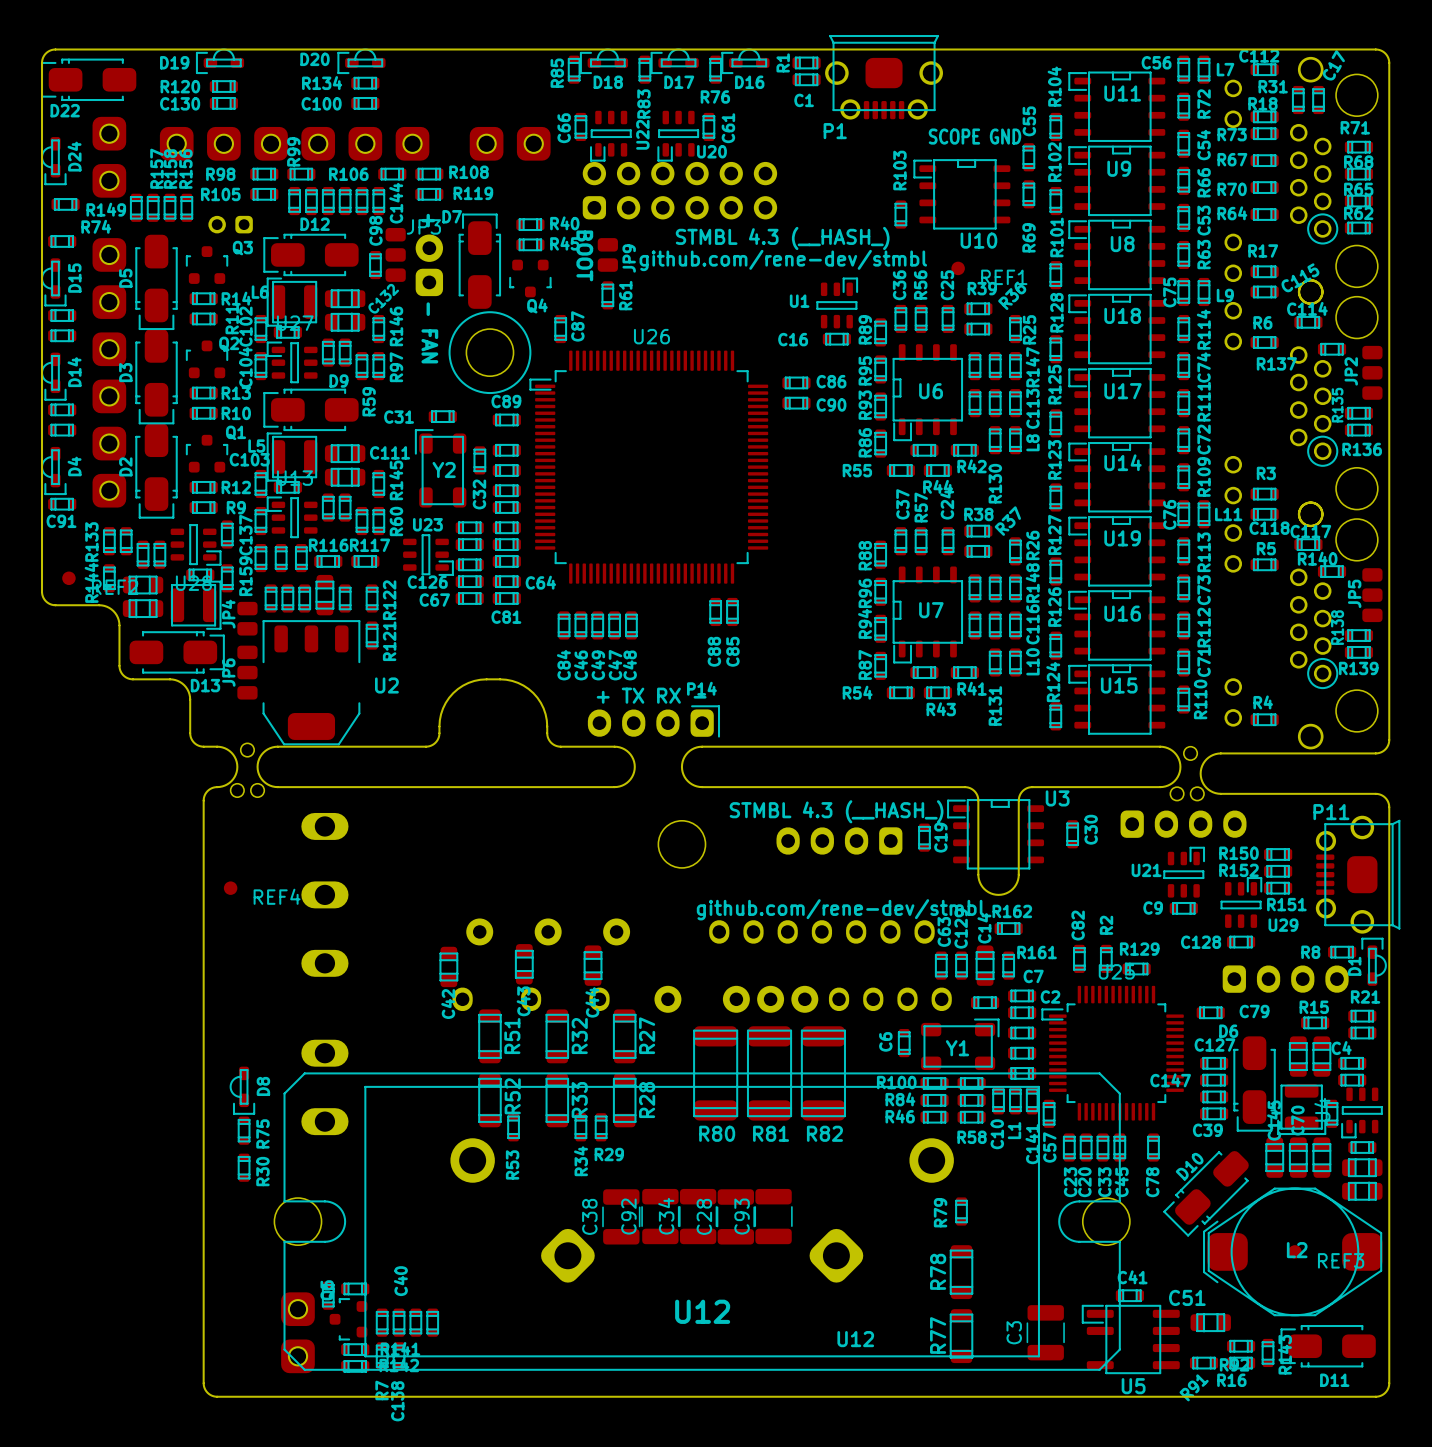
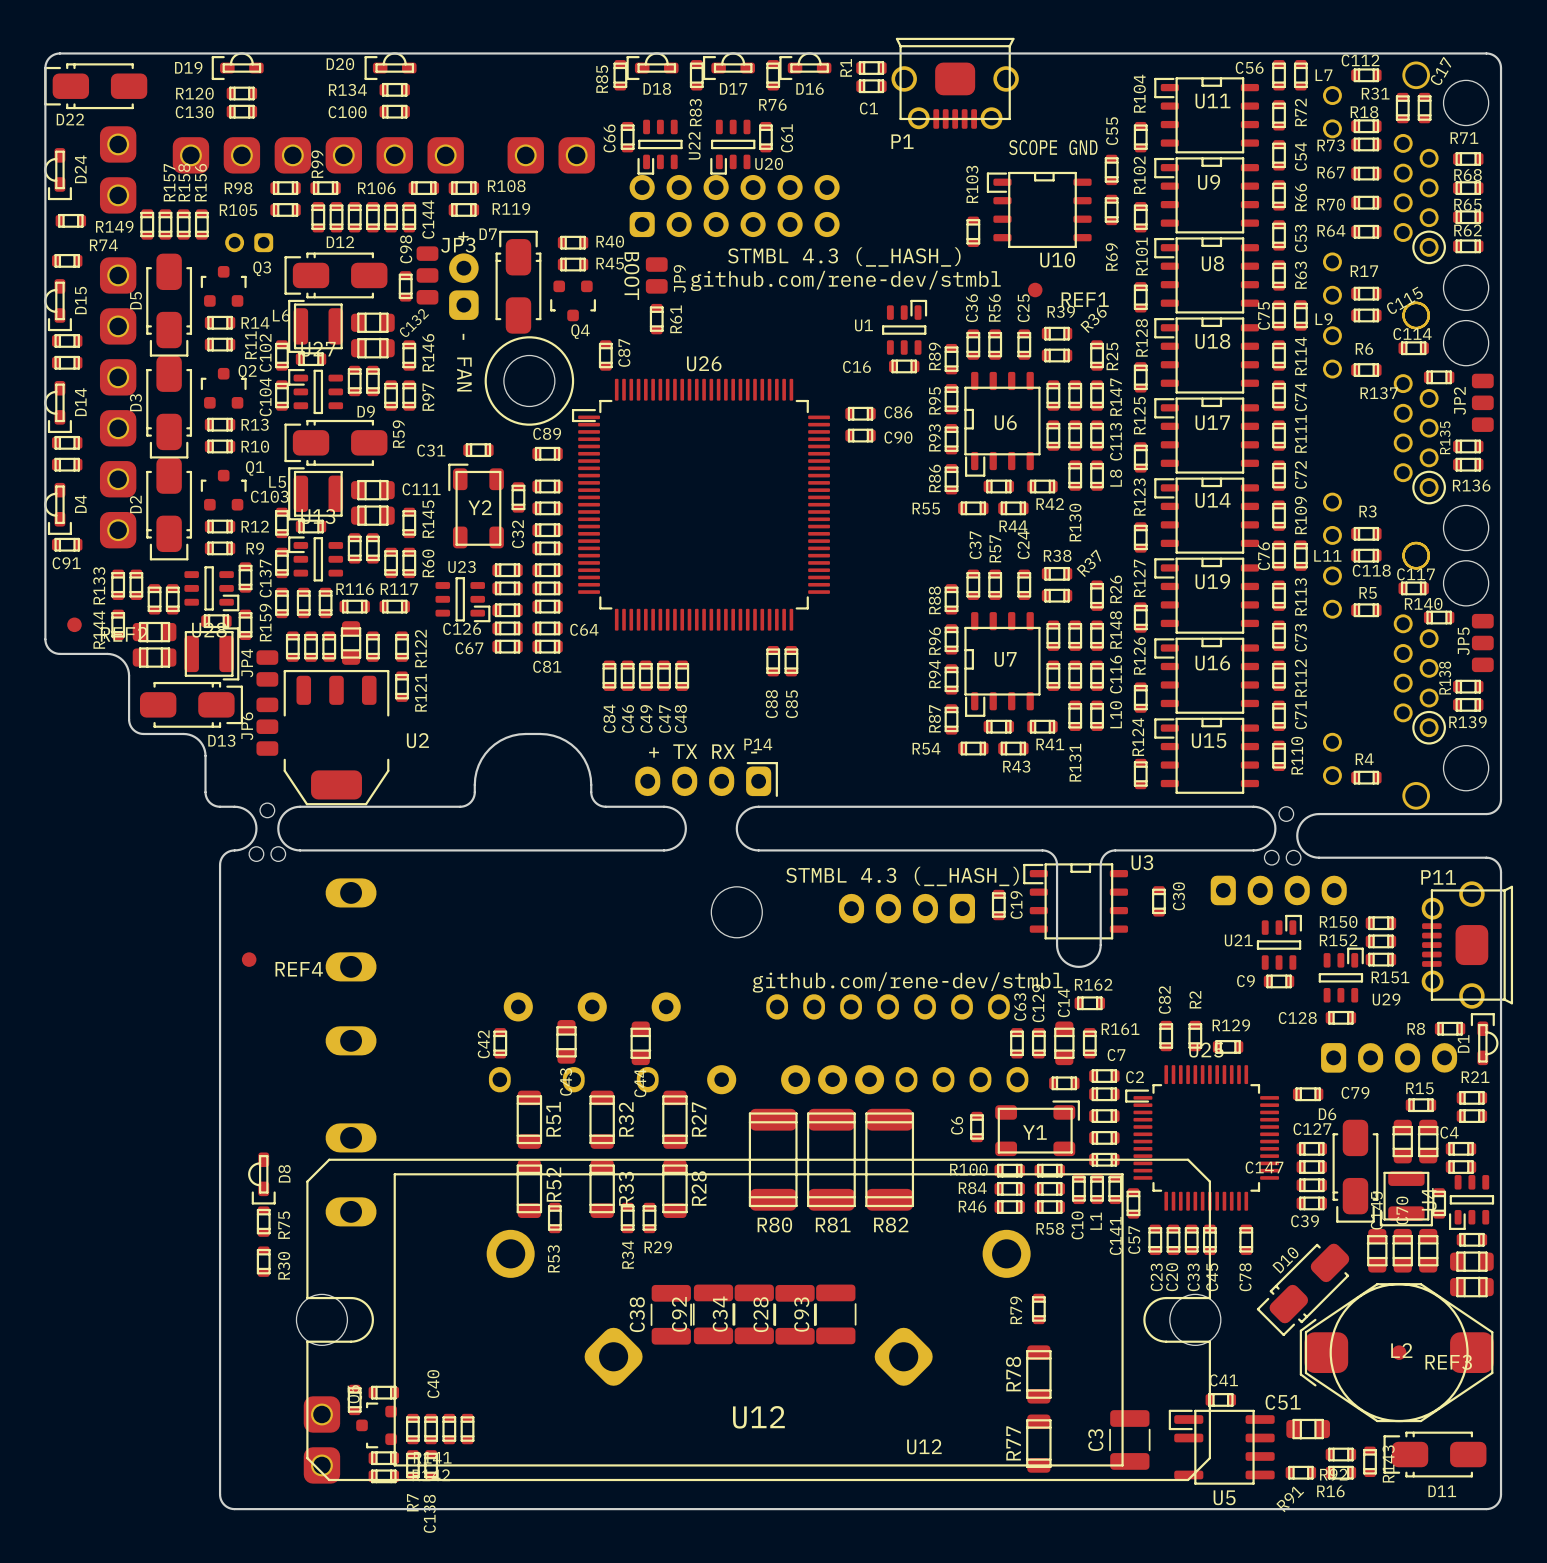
C42 footprint: [439, 946, 459, 988] -> [493, 1028, 508, 1059]
C42 name position: C42 (448, 1004) -> C42 (483, 1044)

